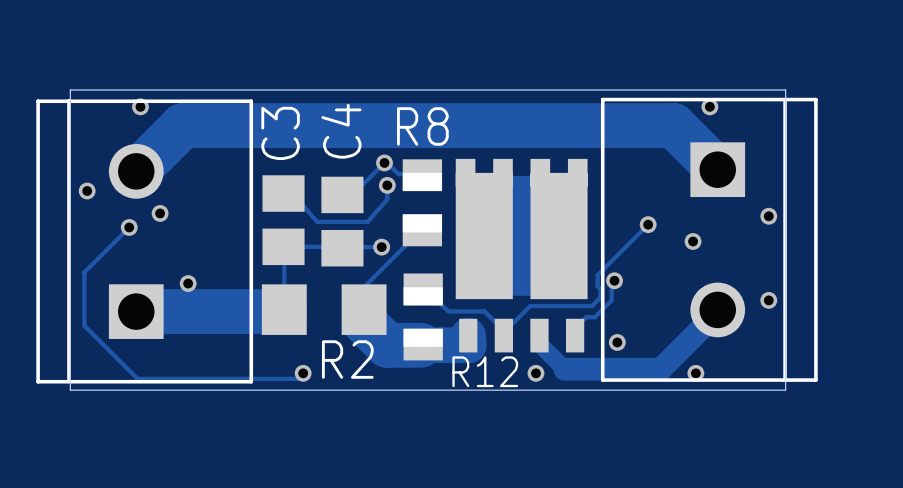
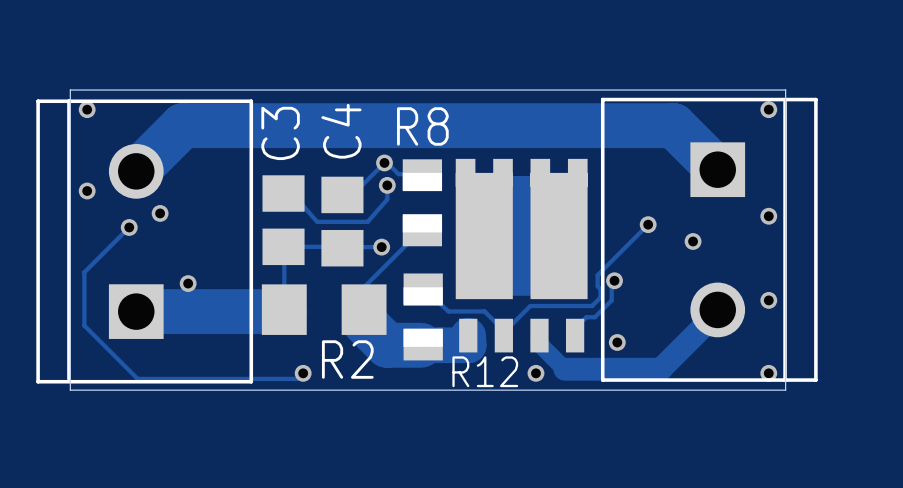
via position: (140, 106) -> (87, 109)
via position: (709, 106) -> (768, 109)
via position: (695, 373) -> (768, 373)

